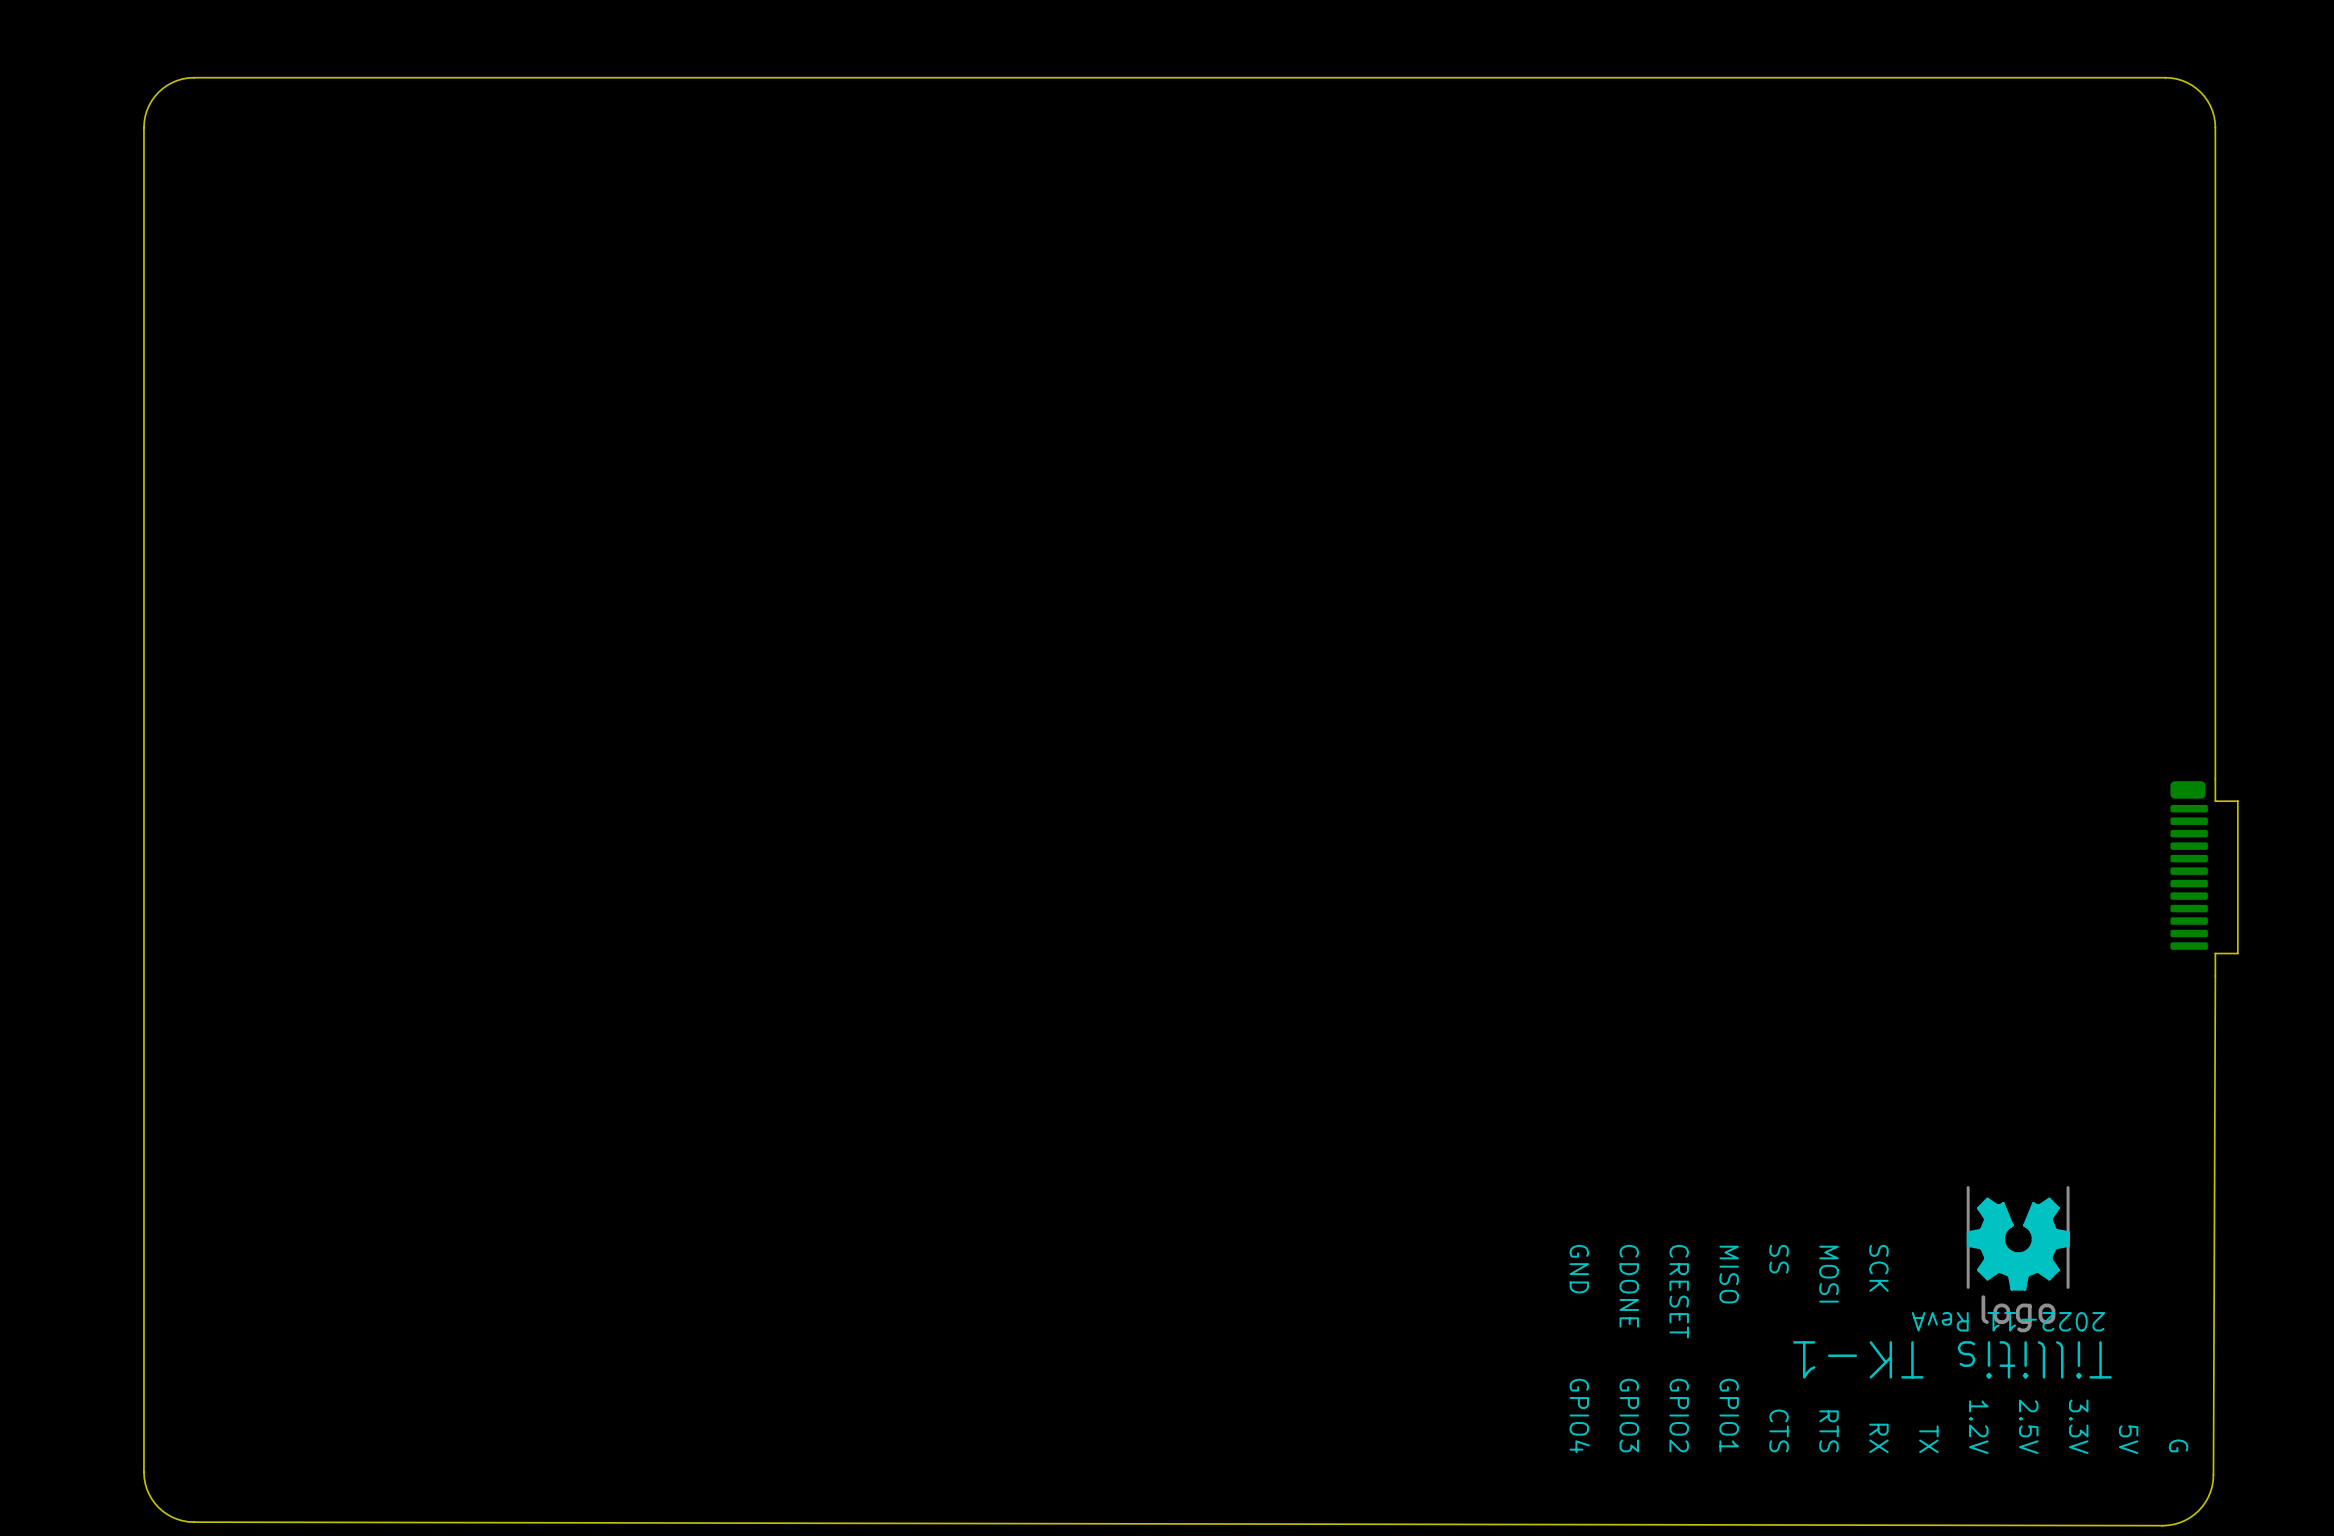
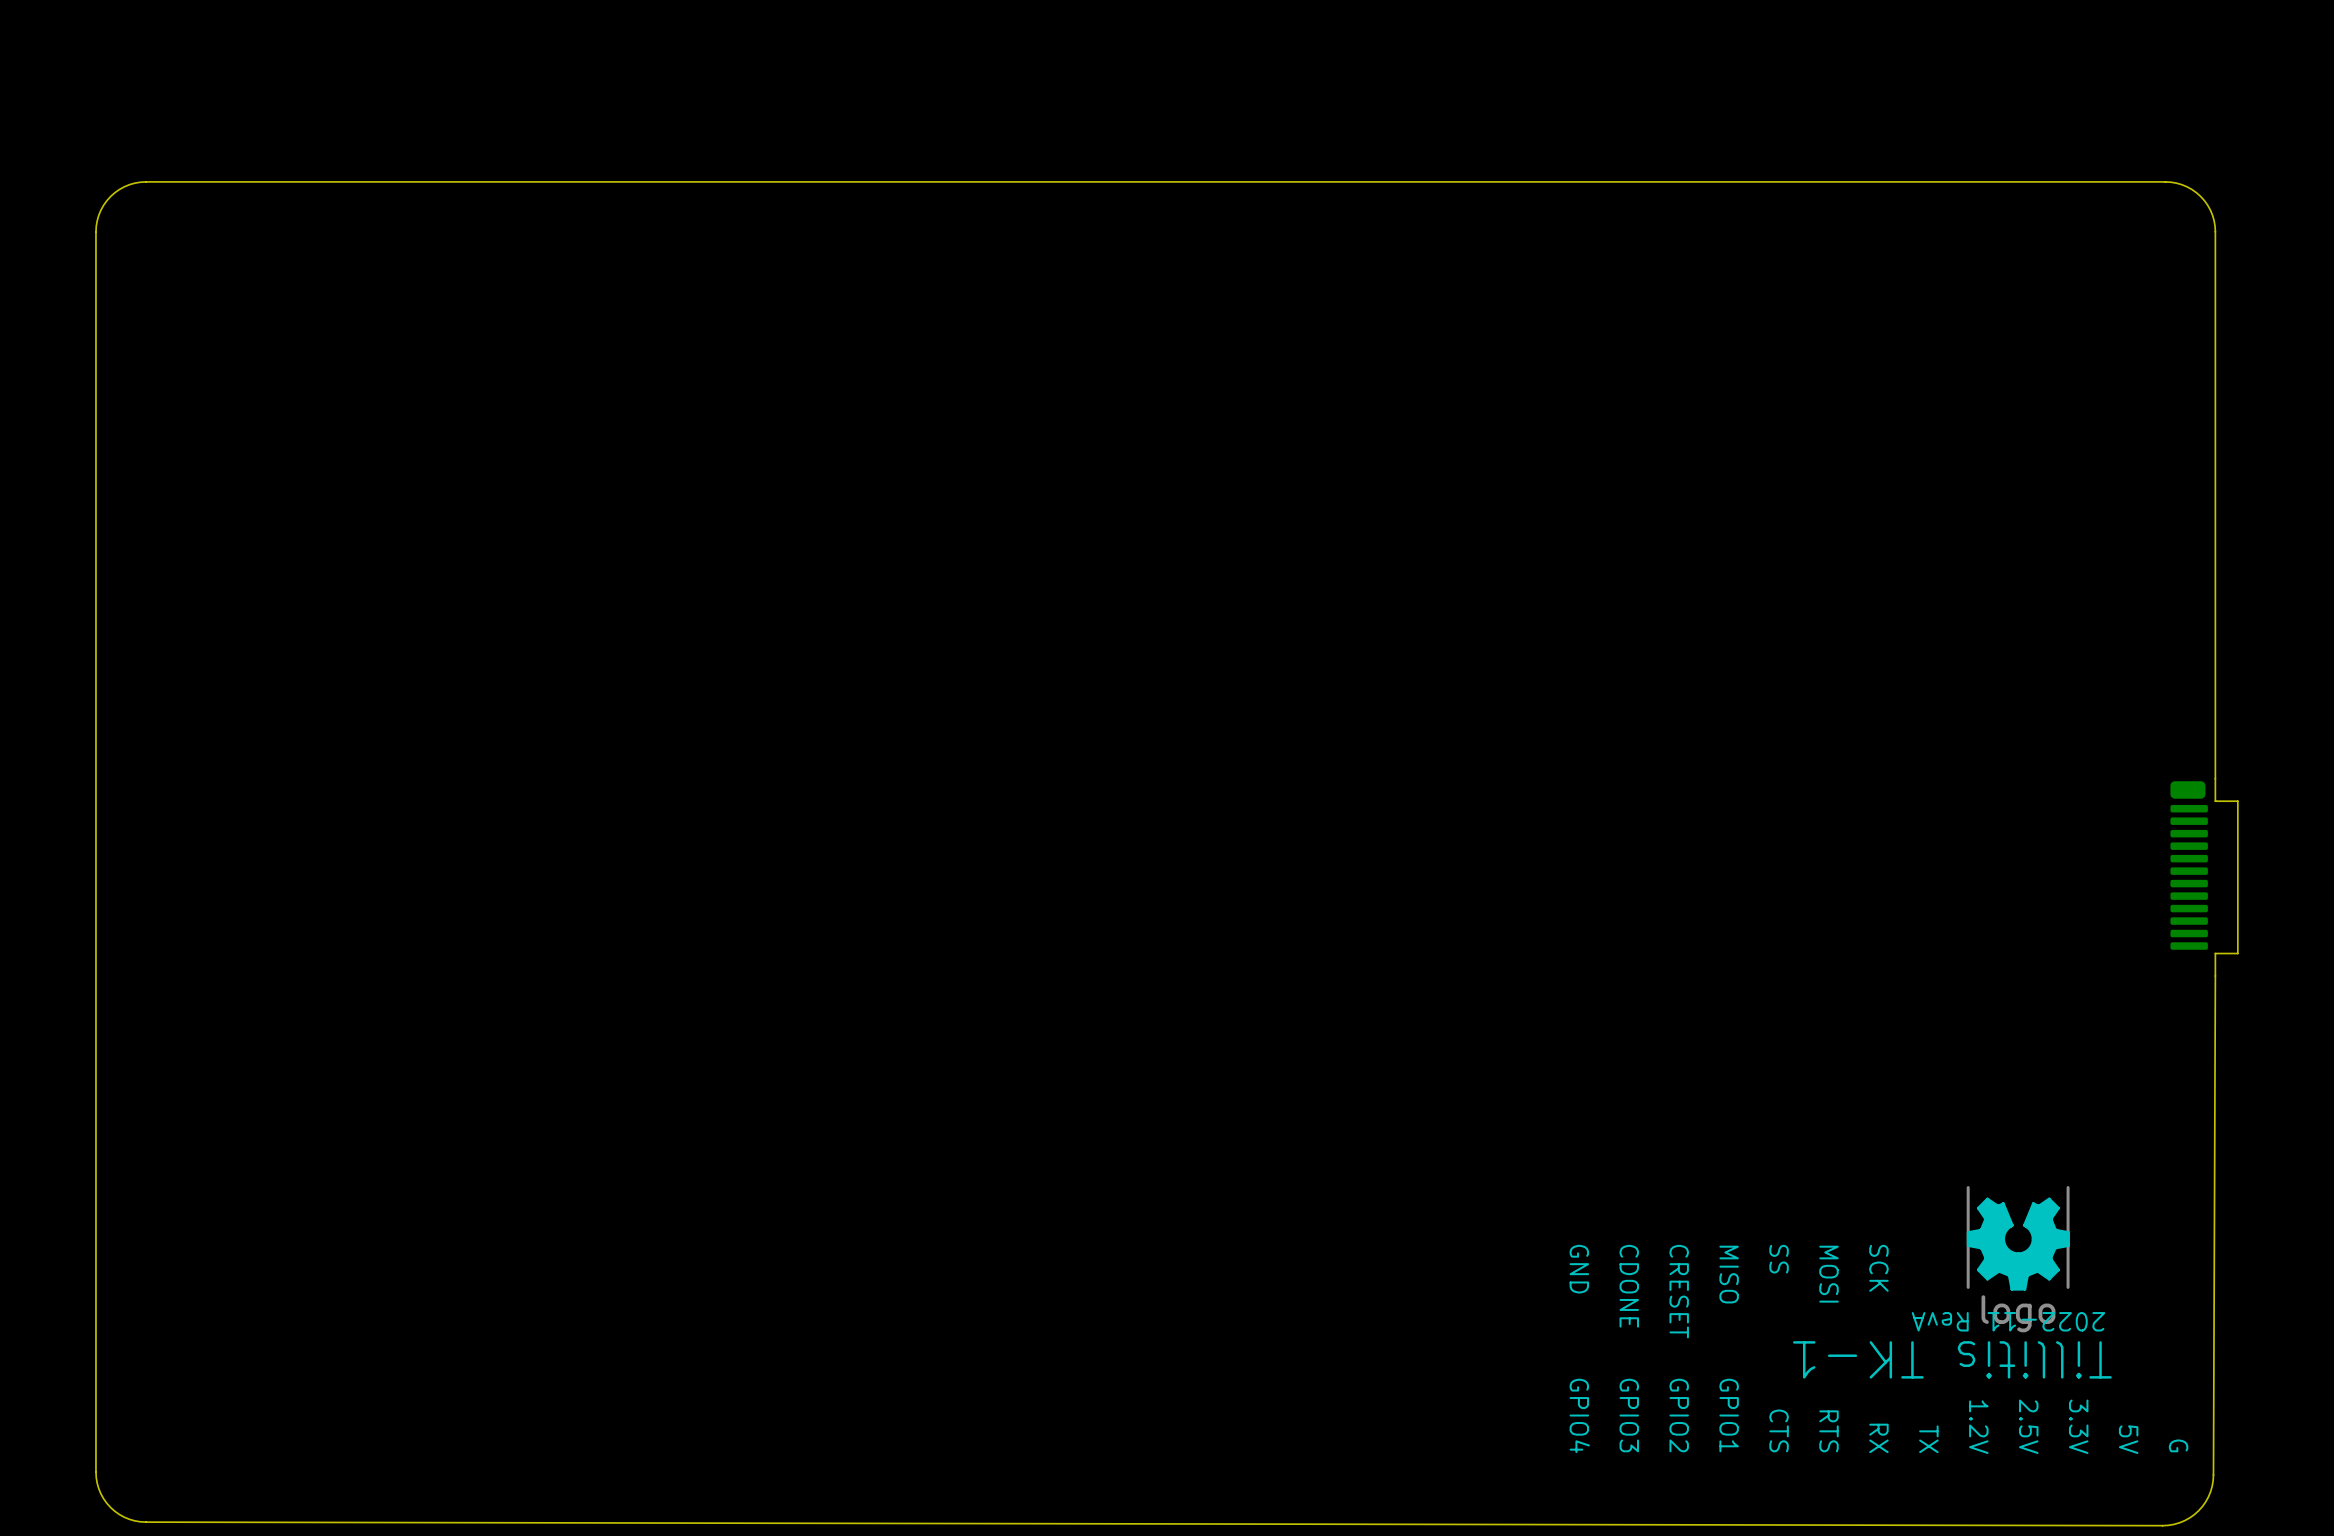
board edge: (2215, 231) (2215, 127) (2212, 111) (2207, 101) (2196, 88) (2181, 80) (2165, 77) (193, 77) (177, 80) (158, 92) (146, 111) (143, 127) (143, 1472) (148, 1493) (154, 1503) (167, 1514) (182, 1520) (193, 1522) (2162, 1525) -> (2215, 231) (2212, 215) (2200, 196) (2181, 184) (2165, 181) (145, 181) (129, 184) (110, 196) (98, 215) (95, 231) (95, 1472) (97, 1483) (103, 1498) (119, 1514) (134, 1520) (145, 1522) (2162, 1525)

